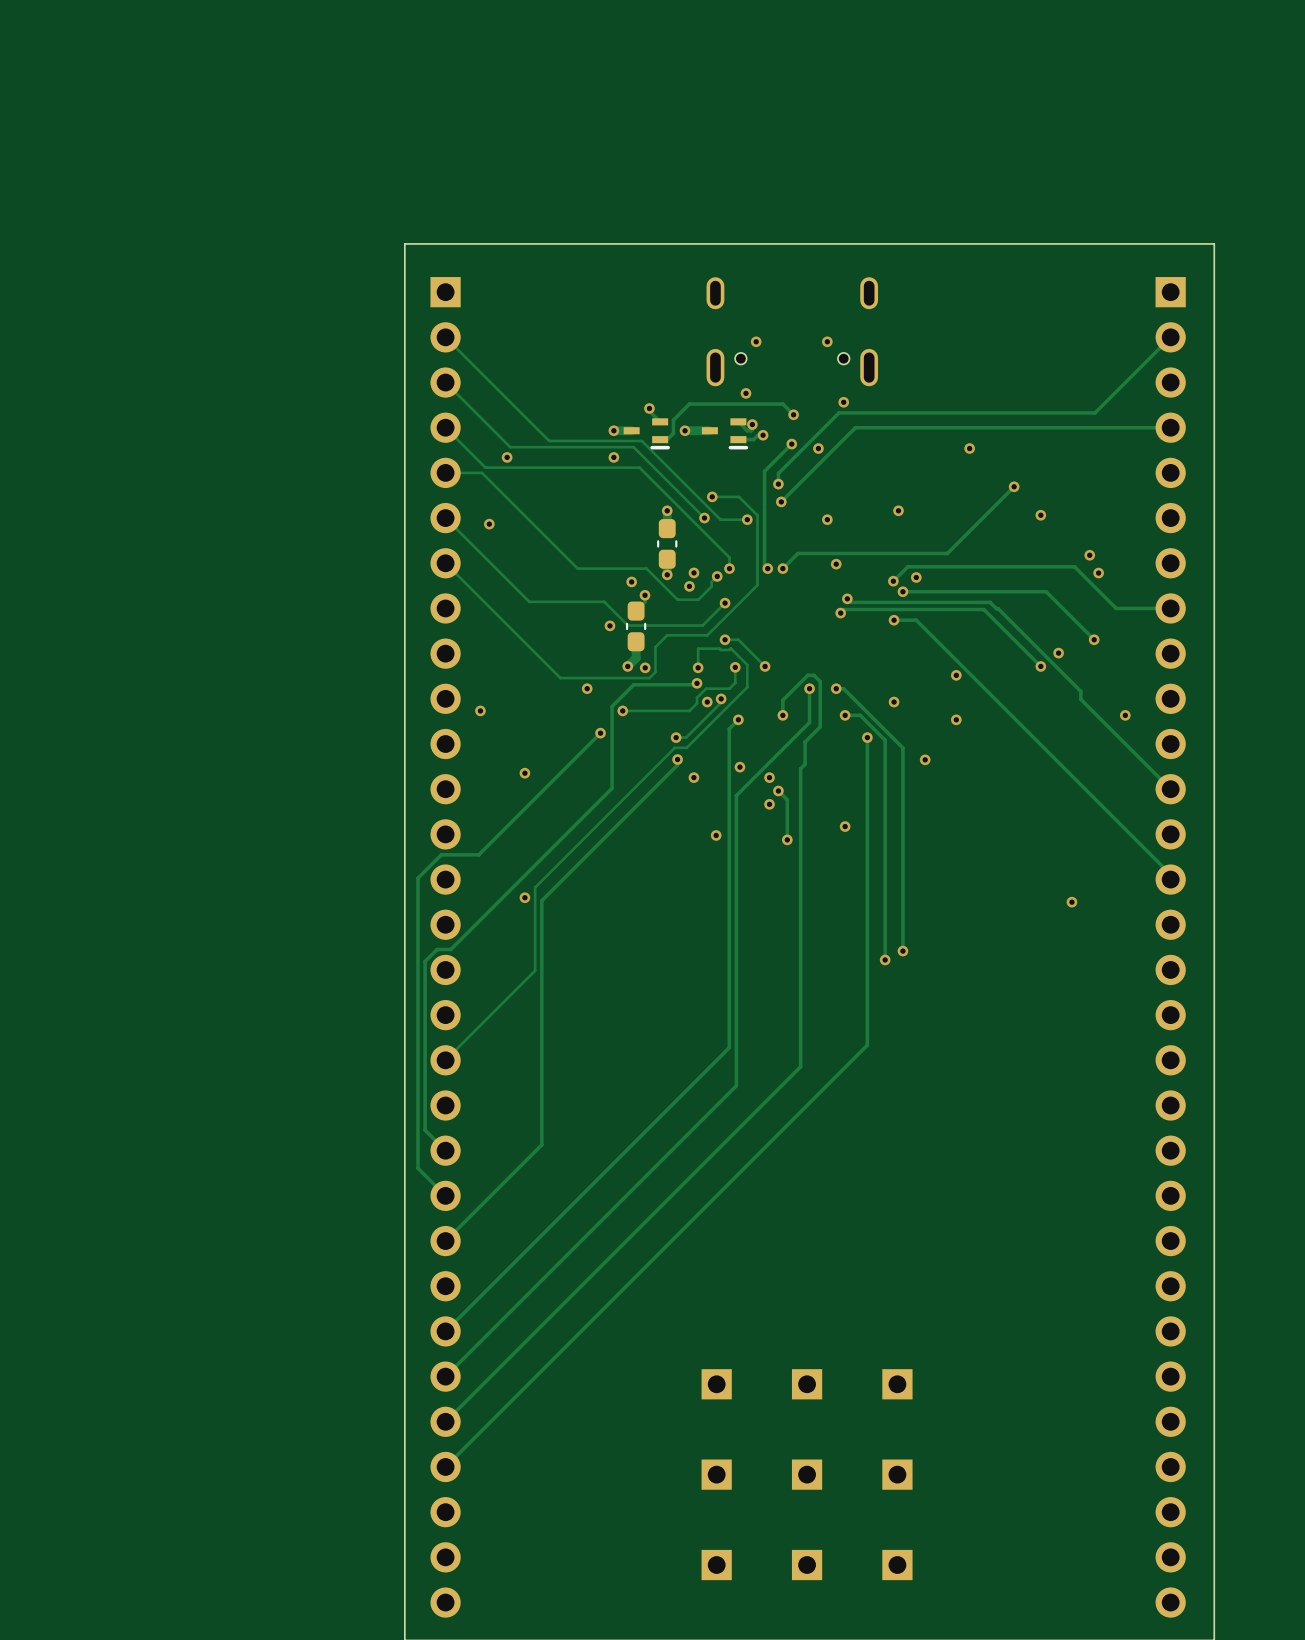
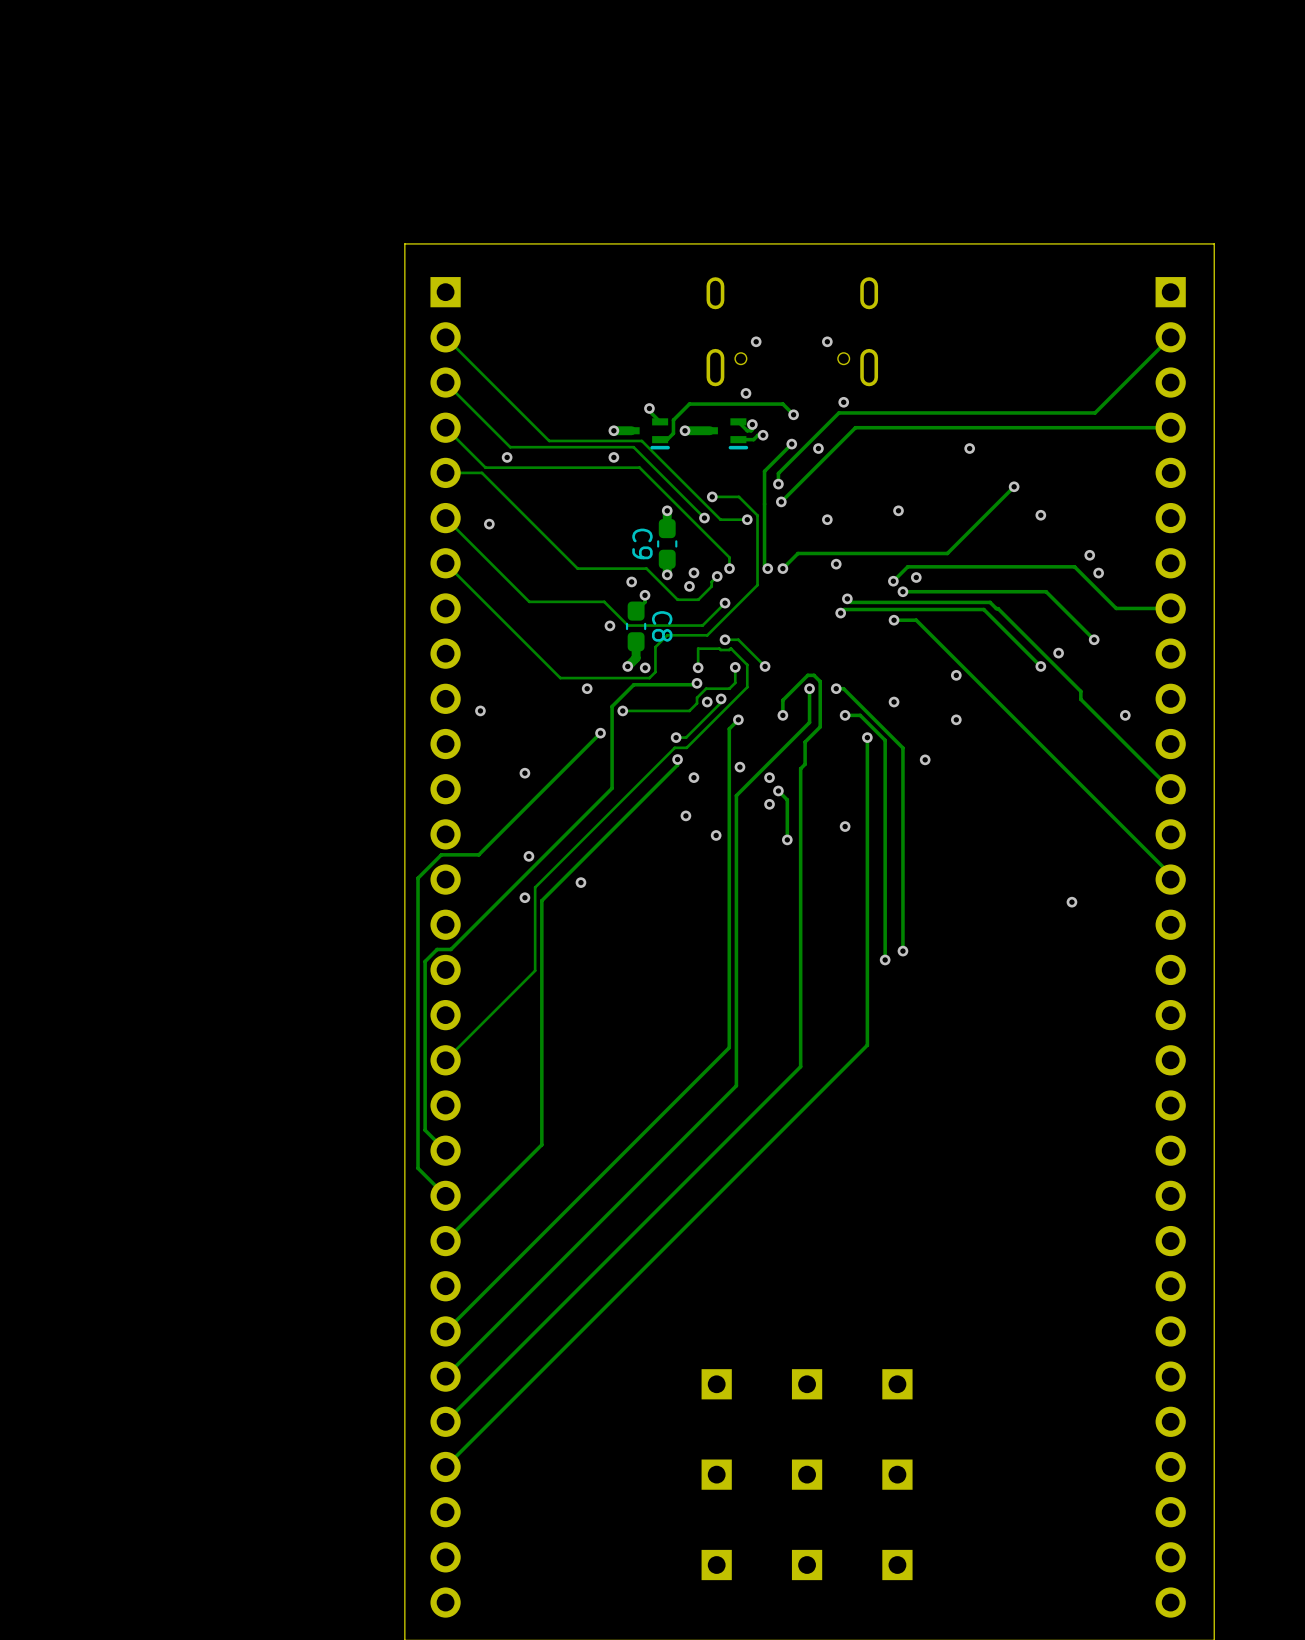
C9 name: none -> C9 (642, 543)
C8 name: none -> C8 (662, 626)
via: none -> (685, 815)
via: none -> (528, 856)
via: none -> (580, 882)

